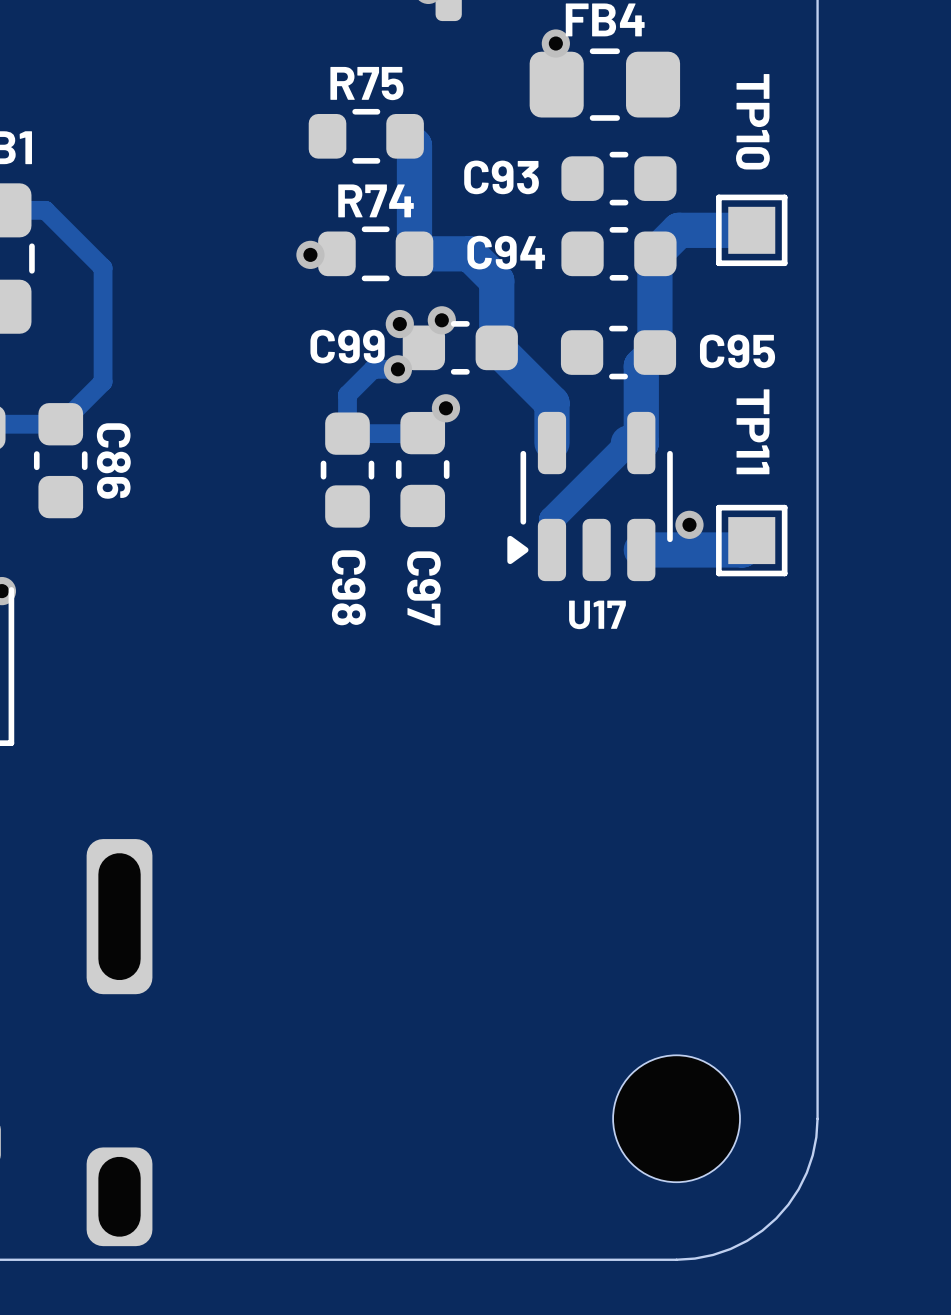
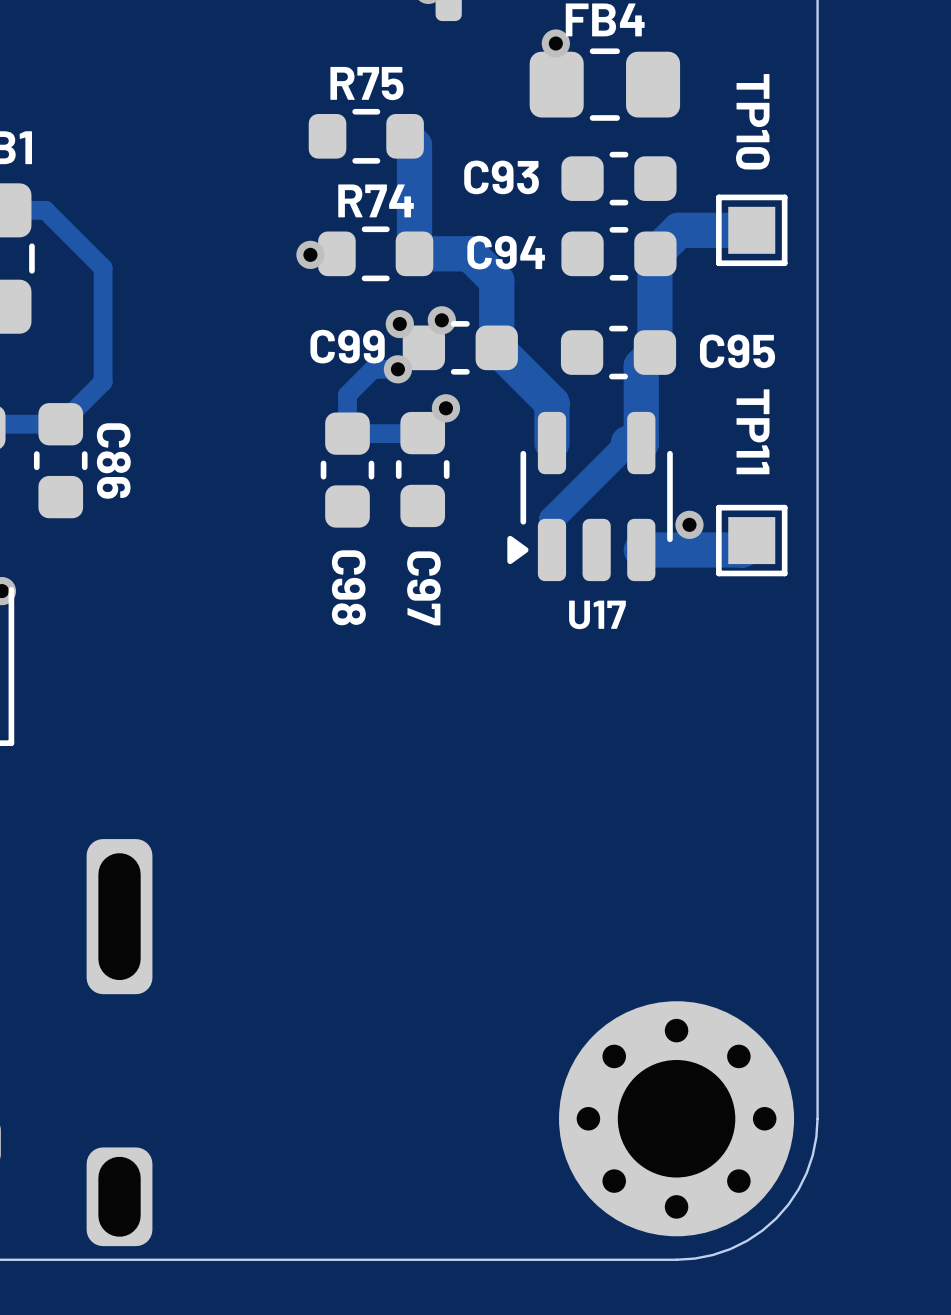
part footprint: [613, 1055, 741, 1183] -> [559, 1001, 795, 1237]

